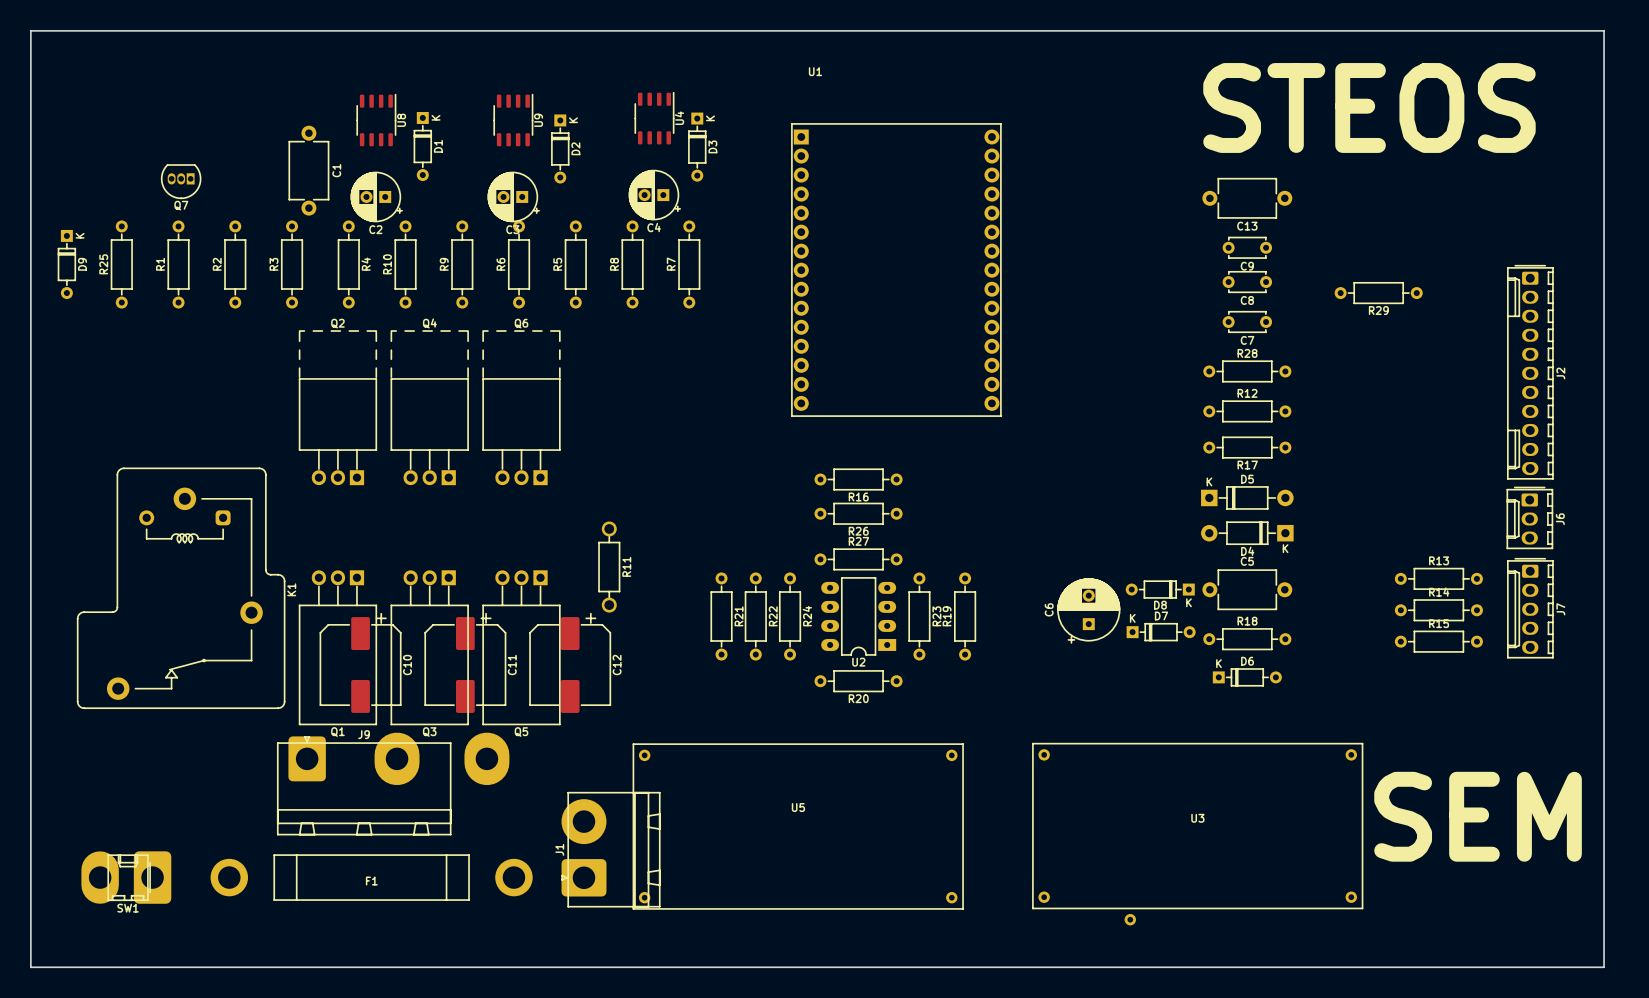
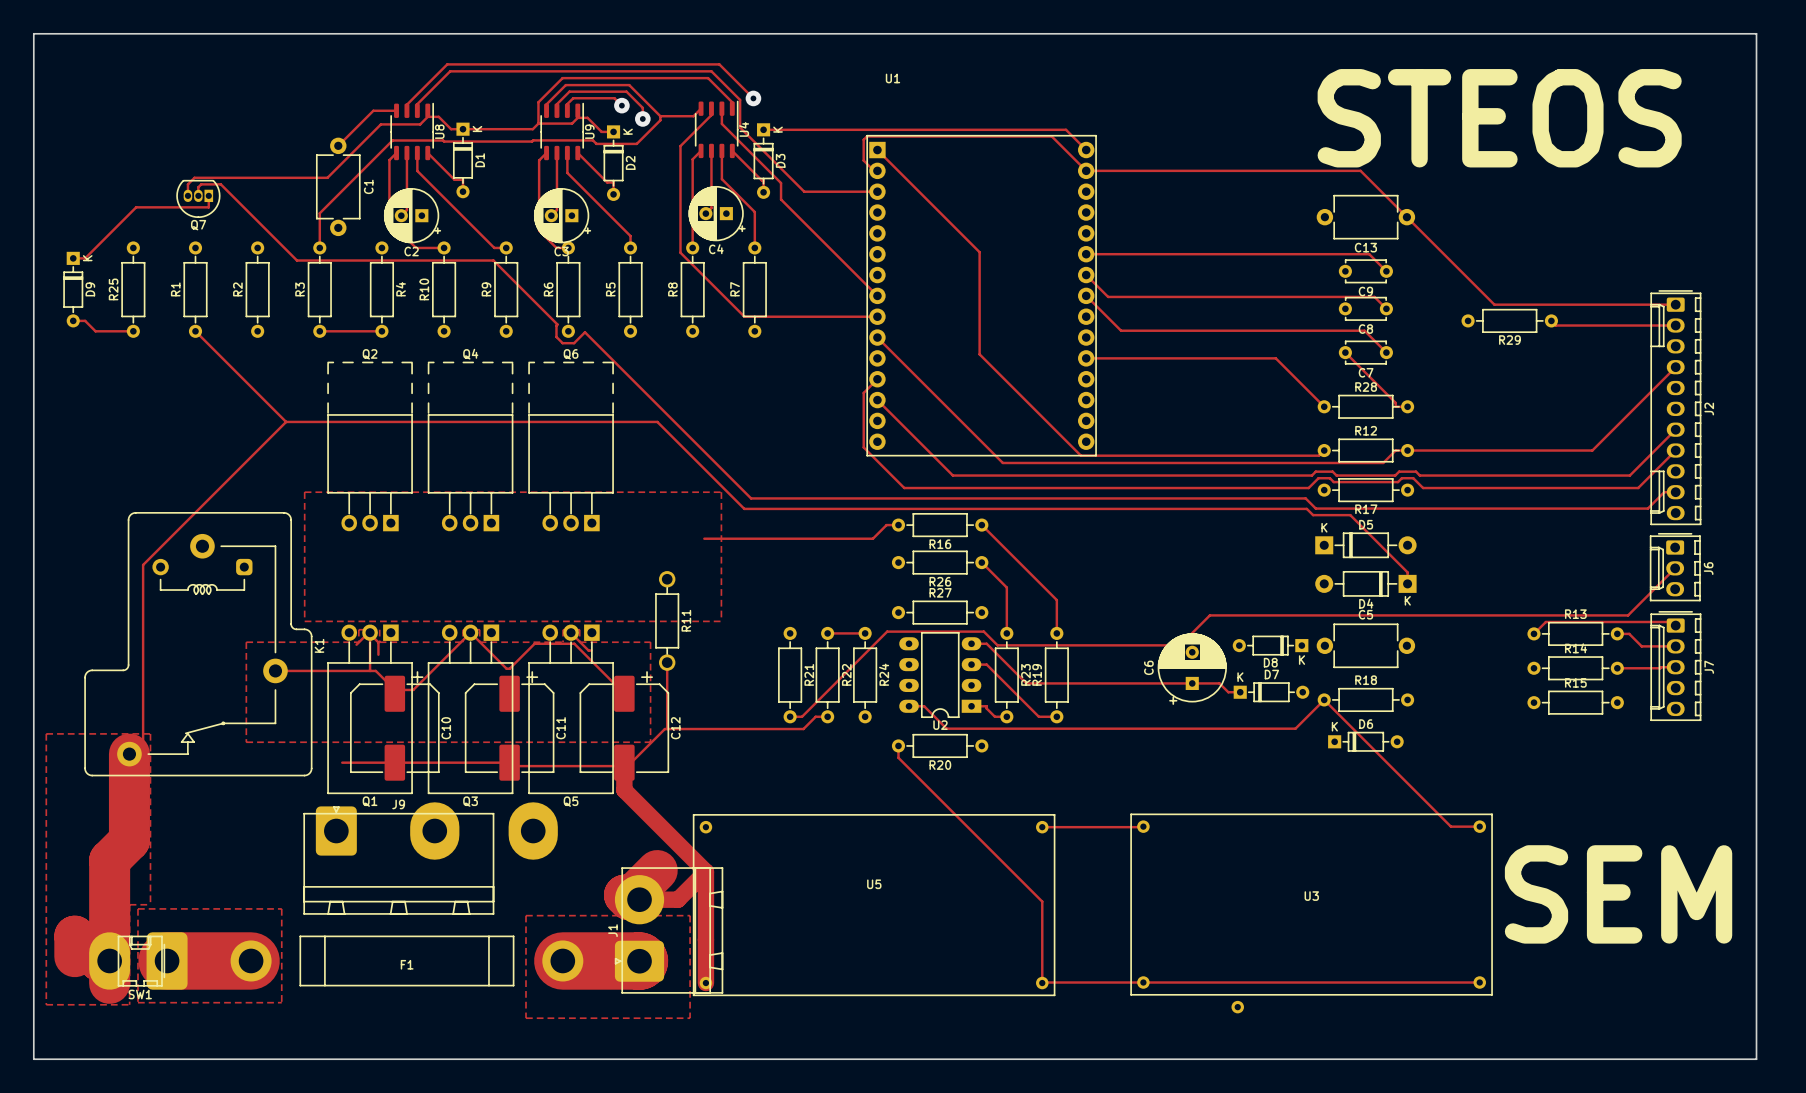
track: none -> (753, 98) (719, 64) (447, 64) (406, 104) (406, 110)
via: none -> (753, 98)
track: none -> (621, 105) (614, 98) (573, 98) (567, 104) (567, 110)
via: none -> (621, 105)
track: none -> (701, 108) (693, 116) (660, 116)
track: none -> (711, 108) (711, 115) (680, 146) (680, 252) (744, 316) (877, 316)
track: none -> (721, 108) (721, 123) (781, 183) (781, 199) (877, 295)
track: none -> (732, 108) (732, 102) (708, 78) (562, 78) (538, 102) (538, 123)
track: none -> (396, 110) (373, 110) (338, 145)
track: none -> (417, 110) (417, 104) (450, 71) (711, 71) (740, 99) (740, 127) (804, 191) (877, 191)
track: none -> (546, 110) (546, 104) (565, 85) (629, 85) (660, 116)
track: none -> (556, 110) (556, 104) (569, 91) (626, 91) (642, 107) (642, 118)
track: none -> (427, 116) (420, 124) (380, 124) (327, 177) (194, 177) (187, 184) (187, 195)
track: none -> (427, 116) (438, 116) (451, 129) (532, 129) (538, 123)
track: none -> (660, 116) (660, 120) (636, 143) (596, 143) (592, 140) (392, 140) (319, 213) (319, 247)
track: none -> (577, 117) (587, 117) (601, 131) (613, 131)
track: none -> (577, 117) (572, 123) (538, 123)
via: none -> (642, 118)
track: none -> (763, 129) (1066, 129) (1086, 150)
track: none -> (701, 150) (692, 159) (692, 247)
track: none -> (711, 150) (711, 208) (705, 213)
track: none -> (721, 150) (721, 179) (754, 212) (754, 247)
track: none -> (732, 150) (763, 180) (763, 192)
track: none -> (877, 150) (979, 252) (979, 354) (1080, 455) (1319, 455) (1324, 450)
track: none -> (396, 153) (389, 160) (389, 221) (416, 247) (444, 247)
track: none -> (406, 153) (406, 210) (401, 215)
track: none -> (417, 153) (417, 170) (494, 247) (506, 247)
track: none -> (427, 153) (454, 179) (463, 179) (463, 191)
track: none -> (546, 153) (539, 160) (539, 230) (556, 247) (568, 247)
track: none -> (556, 153) (556, 210) (551, 215)
track: none -> (567, 153) (567, 172) (630, 236) (630, 247)
track: none -> (577, 153) (607, 182) (613, 182) (613, 194)
track: none -> (877, 170) (874, 170) (863, 160) (863, 139) (866, 136) (1051, 136) (1086, 170) (1360, 170) (1494, 304) (1675, 304)
track: none -> (198, 195) (198, 187) (201, 184) (220, 184) (297, 260) (493, 260) (557, 324) (556, 337) (562, 343) (574, 343) (584, 332) (751, 498) (1305, 498) (1315, 508) (1647, 508) (1664, 492) (1675, 492)
track: none -> (208, 195) (208, 207) (136, 207) (85, 258) (73, 258)
track: none -> (1086, 254) (1369, 254) (1386, 271)
track: none -> (1086, 275) (1108, 296) (1374, 296) (1386, 308)
track: none -> (1086, 295) (1121, 330) (1364, 330) (1386, 352)
track: none -> (73, 320) (85, 320) (95, 331) (133, 331)
track: none -> (1551, 320) (1556, 325) (1675, 325)
track: none -> (195, 331) (286, 421)
track: none -> (319, 331) (381, 331)
track: none -> (877, 337) (1002, 462) (1383, 462) (1395, 450) (1592, 450) (1675, 367)
track: none -> (1345, 352) (1395, 402) (1395, 406) (1407, 406)
track: none -> (1086, 358) (1275, 358) (1324, 406)
track: none -> (877, 379) (863, 392) (863, 447) (904, 488) (1308, 488) (1318, 478) (1329, 478) (1333, 482) (1398, 482) (1401, 478) (1413, 478) (1423, 488) (1638, 488) (1675, 450)
track: none -> (877, 400) (952, 475) (1311, 475) (1315, 471) (1332, 471) (1336, 475) (1395, 475) (1399, 471) (1416, 471) (1419, 475) (1629, 475) (1675, 429)
track: none -> (286, 421) (657, 421) (744, 508) (1306, 508) (1313, 515) (1350, 515) (1407, 572) (1407, 583)
track: none -> (286, 421) (143, 564) (143, 740)
zone outline: none -> (304, 492) (304, 621) (721, 621) (721, 492) (304, 492)
track: none -> (898, 525) (886, 525) (872, 538) (704, 538)
track: none -> (981, 525) (1056, 600) (1056, 633)
track: none -> (981, 562) (1006, 587) (1006, 633)
track: none -> (1675, 568) (1628, 615) (1209, 615) (1179, 645) (997, 645) (983, 631) (887, 631) (802, 716) (790, 716)
track: none -> (1675, 625) (1672, 621) (1545, 621) (1533, 633)
zone outline: none -> (358, 629) (379, 629) (379, 642) (463, 642) (463, 629) (479, 629) (479, 642) (563, 642) (563, 629) (579, 629) (579, 642) (650, 642) (650, 742) (246, 742) (246, 642) (358, 642) (358, 629)
track: none -> (571, 633) (588, 650) (591, 650)
track: none -> (827, 633) (865, 633)
track: none -> (1617, 633) (1629, 633) (1641, 646) (1675, 646)
track: none -> (370, 634) (378, 642) (378, 654)
track: none -> (971, 643) (986, 643) (1026, 683) (1219, 683) (1228, 692) (1240, 692)
track: none -> (356, 644) (370, 632) (370, 670)
track: none -> (667, 662) (667, 729)
track: none -> (971, 664) (986, 664) (1038, 716) (1056, 716)
track: none -> (1675, 667) (1617, 668)
track: none -> (275, 670) (375, 670) (394, 689)
track: none -> (394, 689) (413, 689) (470, 632) (506, 668) (509, 668) (534, 643) (574, 643) (624, 693)
track: none -> (909, 706) (924, 706) (946, 728) (1295, 728) (1324, 699) (1450, 826) (1479, 826)
track: none -> (971, 706) (986, 706) (994, 716) (1006, 716)
track: none -> (827, 716) (815, 716) (803, 729) (664, 729) (624, 769)
zone outline: none -> (46, 733) (46, 1004) (129, 1004) (129, 904) (150, 904) (150, 733) (46, 733)
track: none -> (898, 745) (898, 757) (1042, 901) (1042, 983)
track: none -> (129, 754) (129, 840) (109, 860) (109, 983)
track: none -> (342, 762) (509, 762) (513, 766) (624, 766)
track: none -> (624, 762) (624, 790) (705, 871)
track: none -> (1143, 826) (1042, 827)
track: none -> (657, 870) (632, 895) (624, 895) (629, 899) (678, 899) (705, 871)
track: none -> (705, 871) (705, 983) (705, 939)
zone outline: none -> (137, 908) (137, 1002) (281, 1002) (281, 908) (137, 908)
zone outline: none -> (526, 915) (526, 1018) (690, 1018) (690, 915) (526, 915)
track: none -> (74, 956) (74, 936) (99, 960) (109, 960)
track: none -> (150, 960) (251, 960) (167, 960)
track: none -> (562, 960) (639, 961)
track: none -> (1042, 982) (1479, 982)

